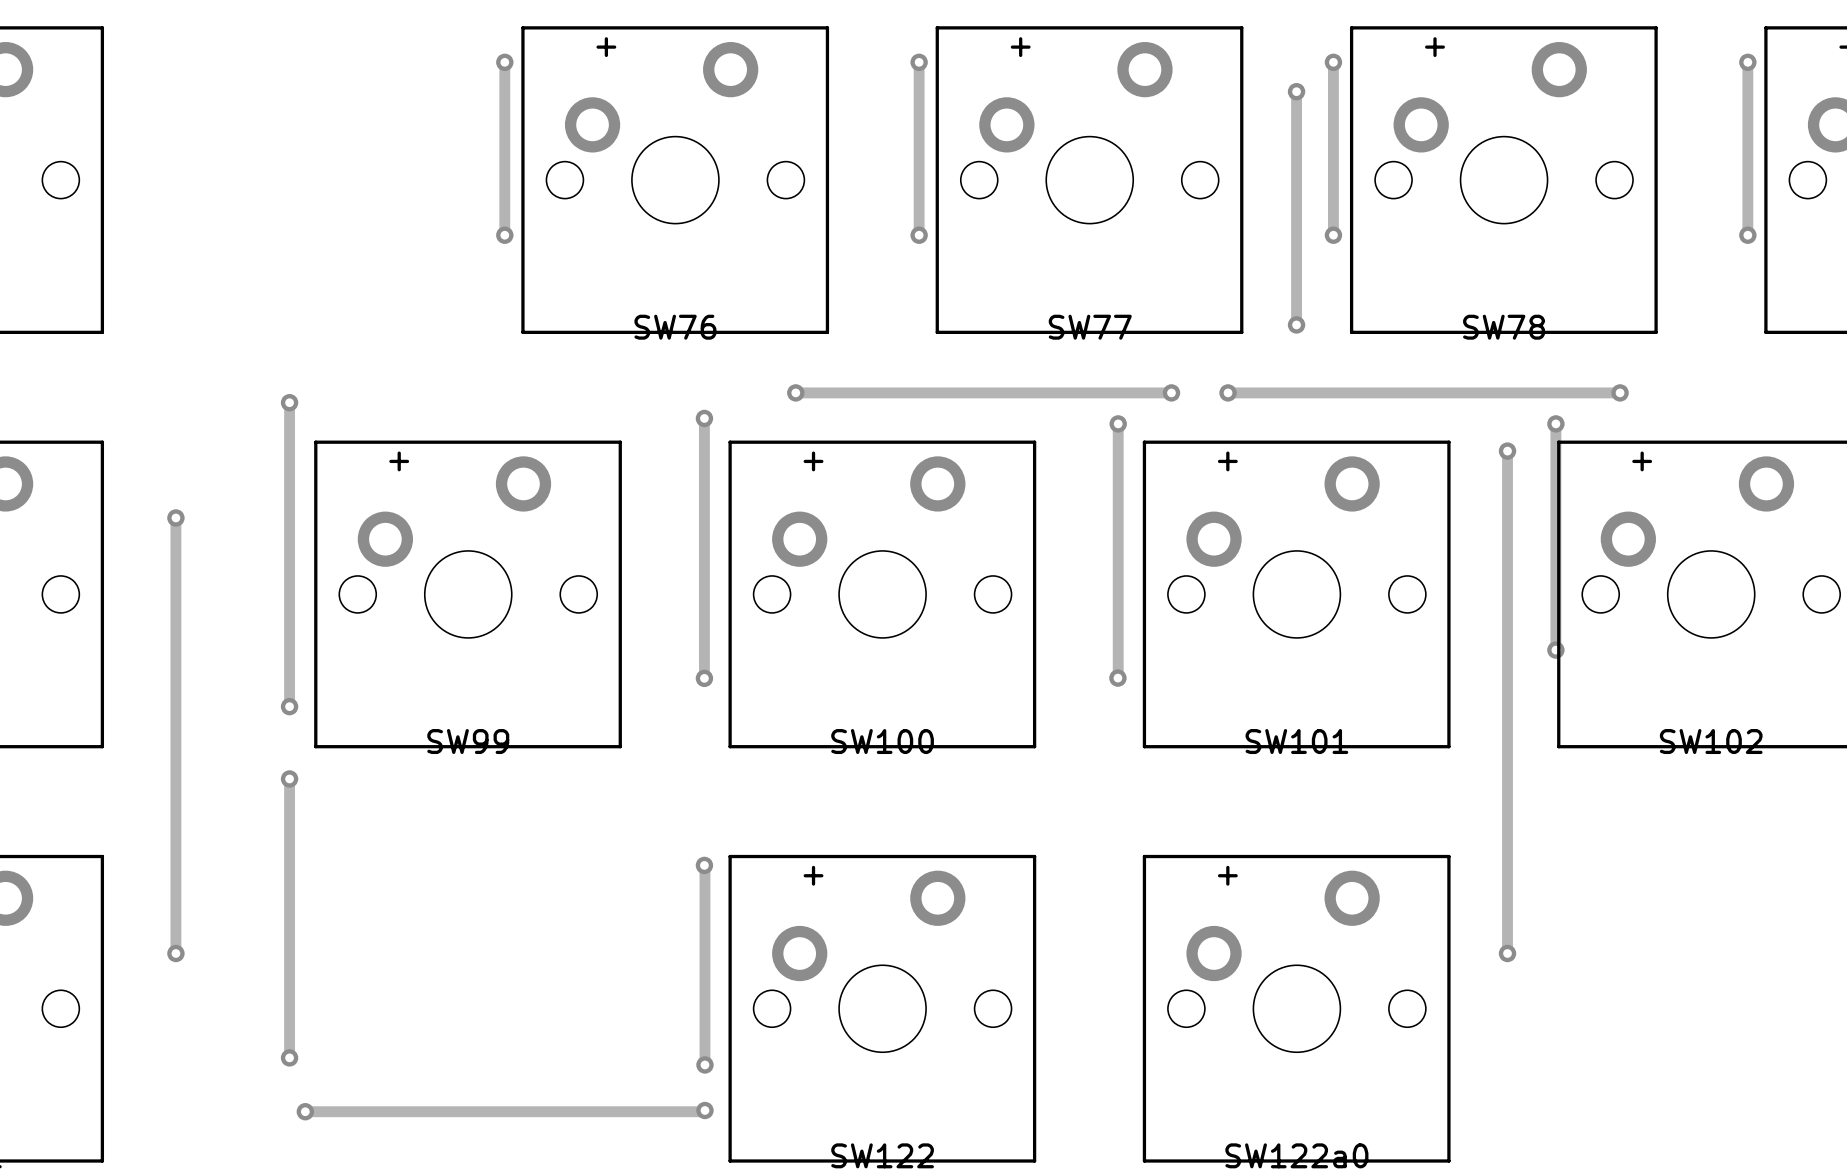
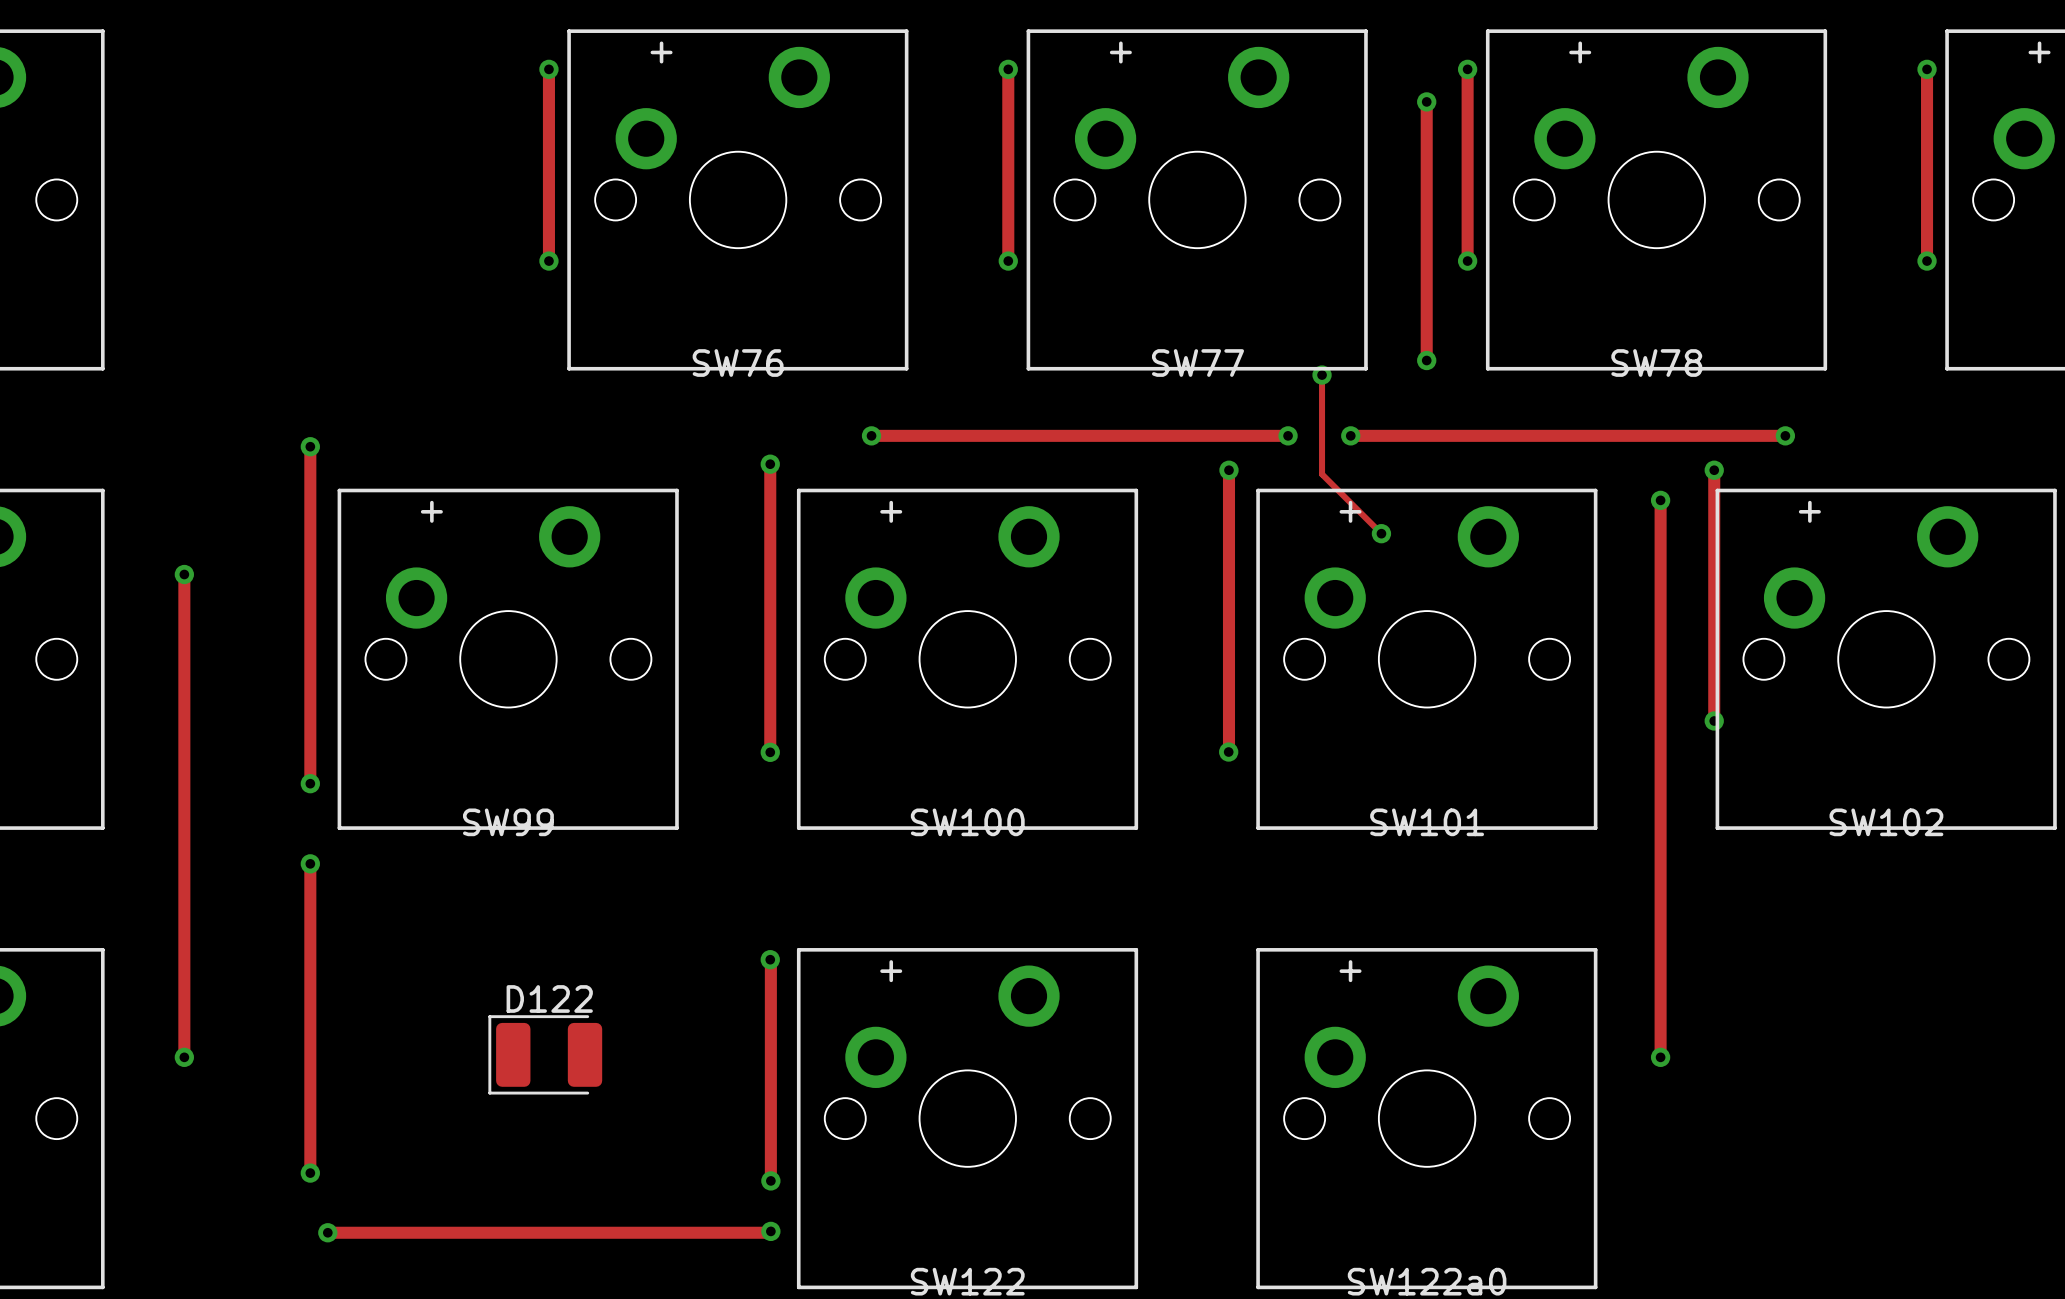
track: none -> (1322, 375) (1322, 474) (1381, 533)
via: none -> (1322, 375)
via: none -> (1381, 533)
D122: none -> (545, 1054)

